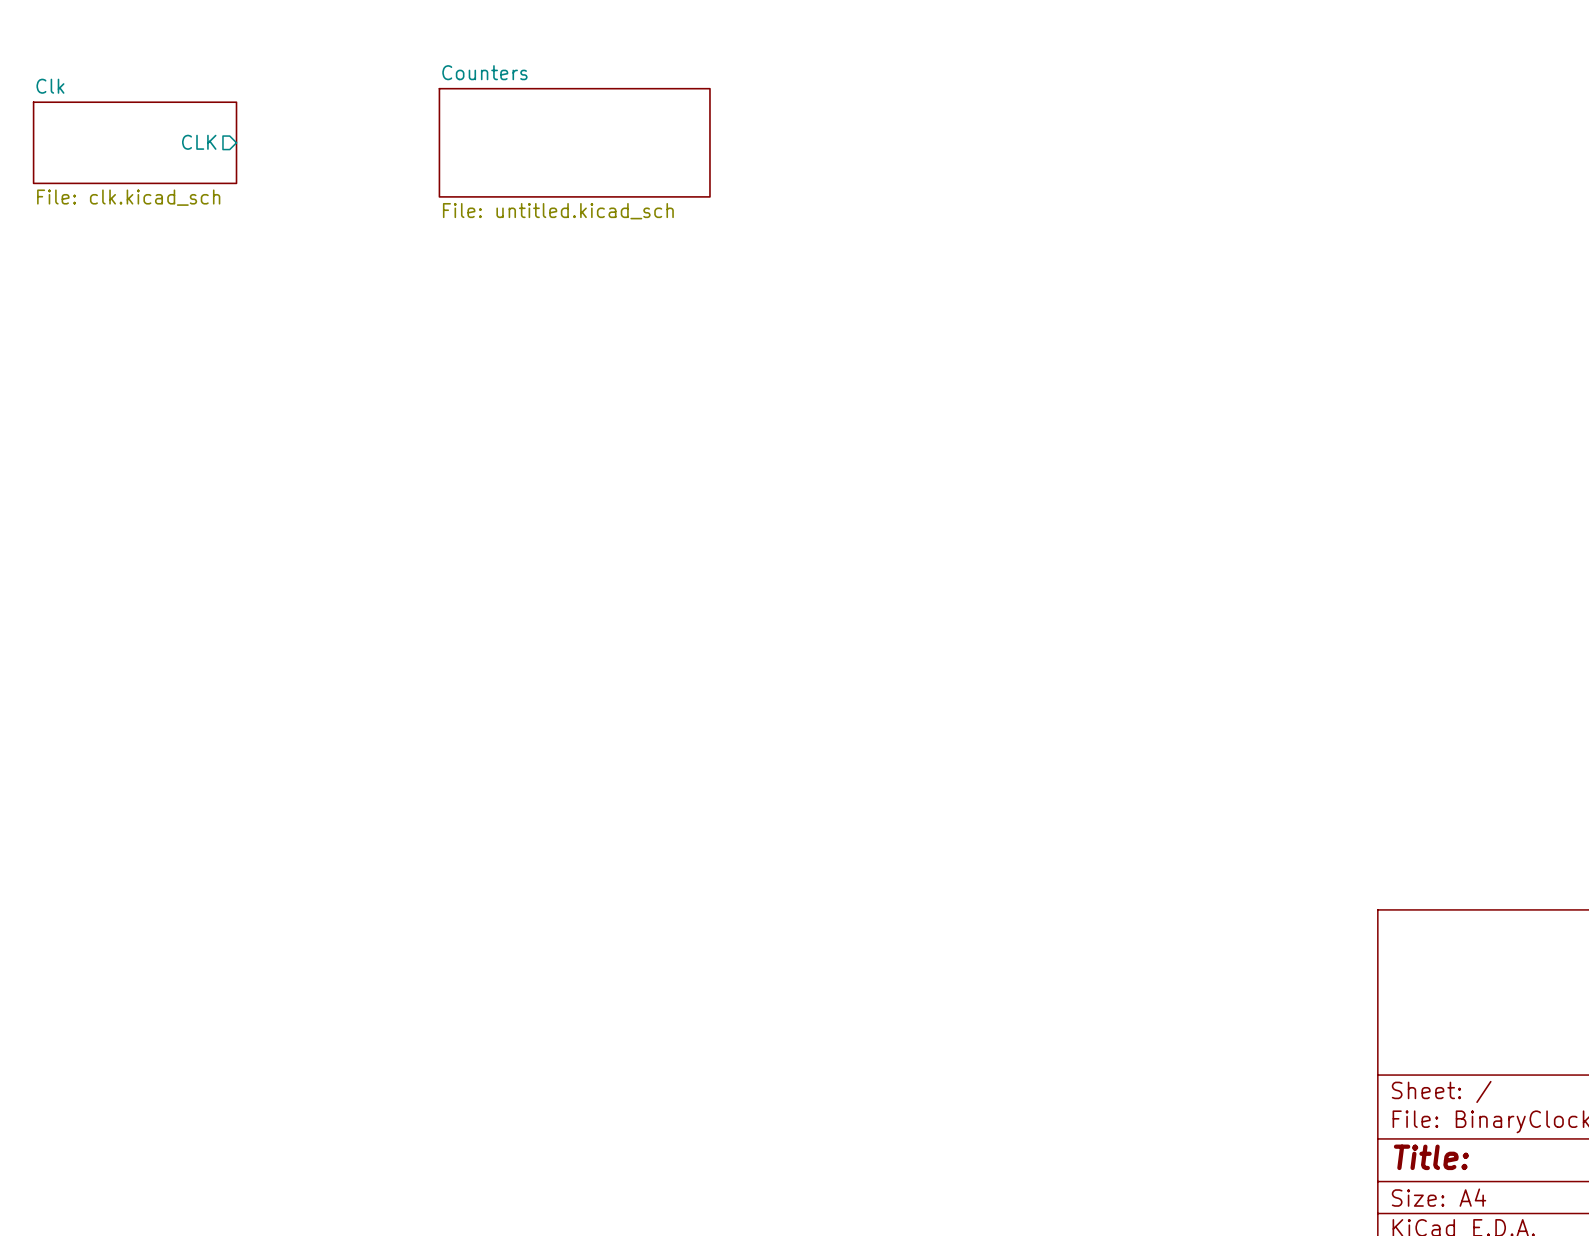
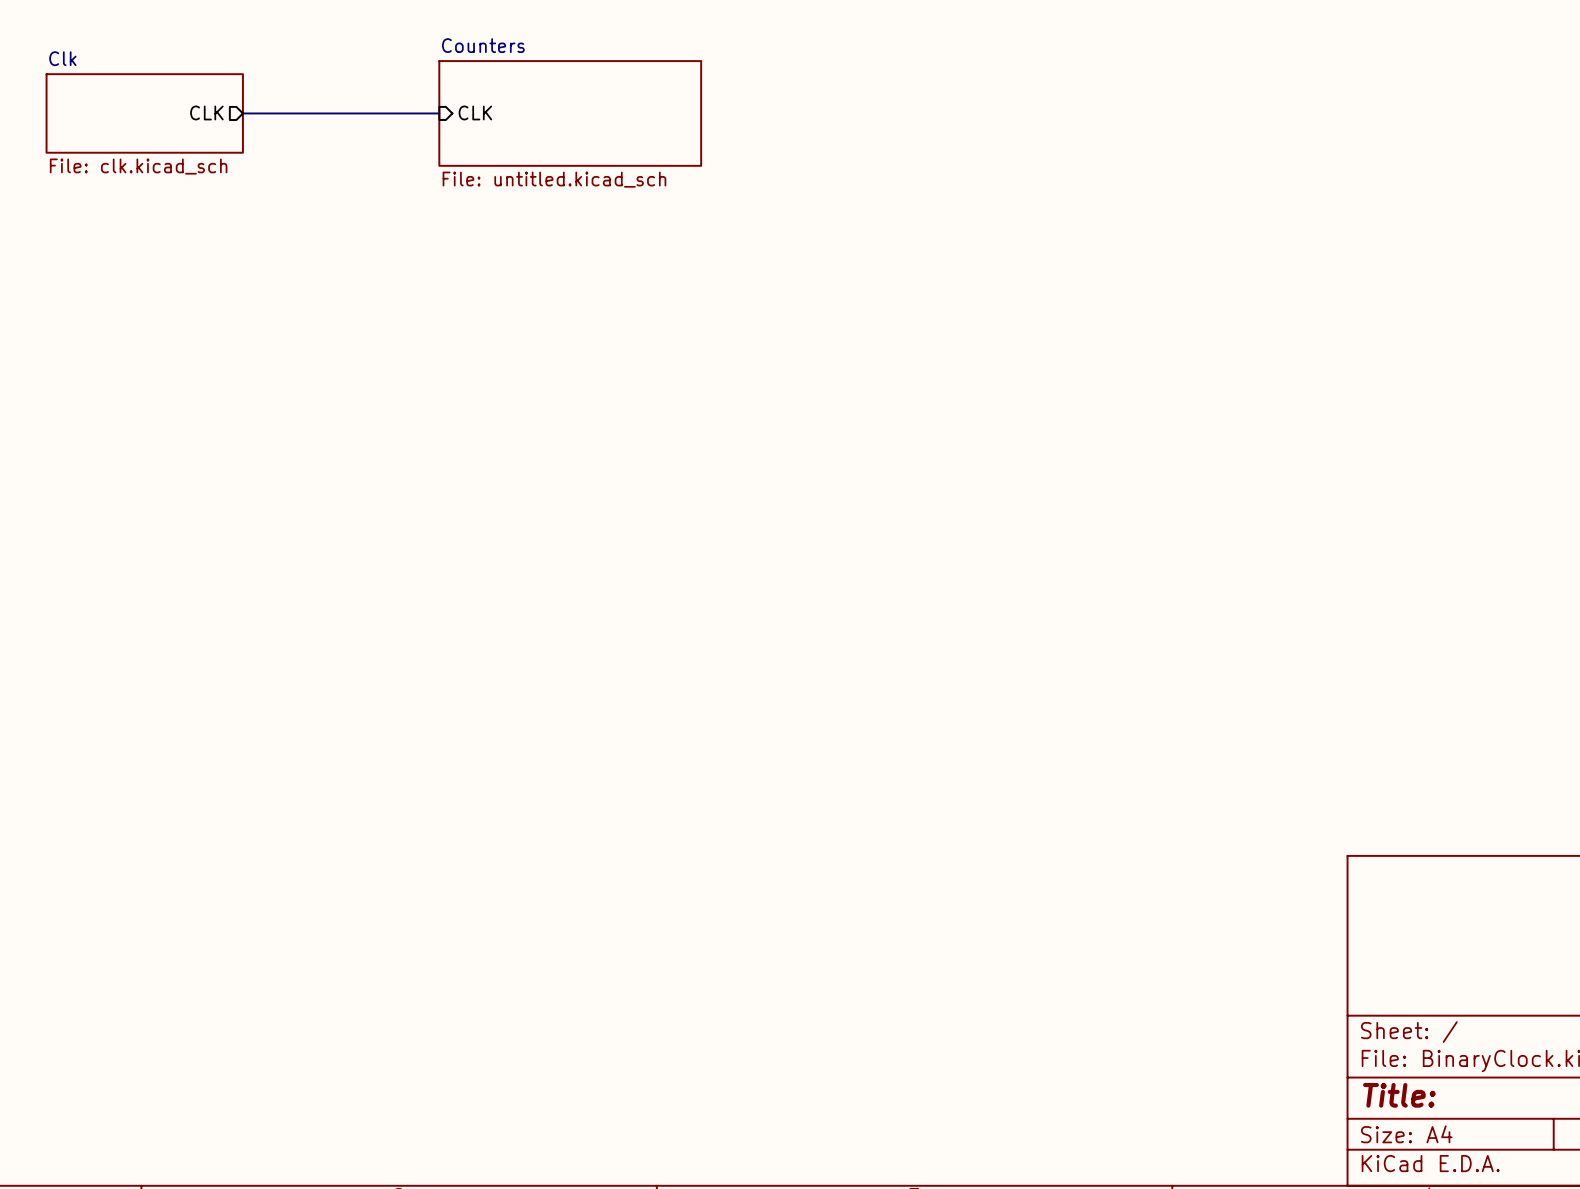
wire: none -> (242, 113) (439, 113)
sheet pin: none -> CLK (475, 112)

